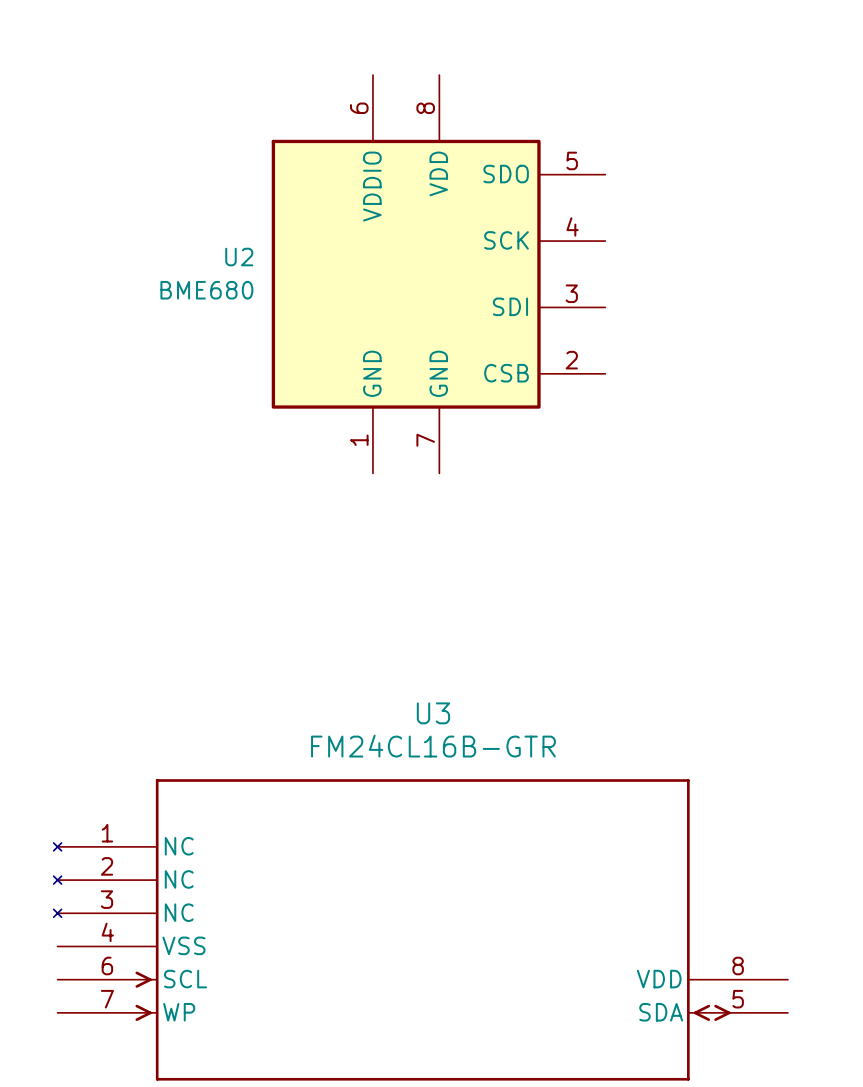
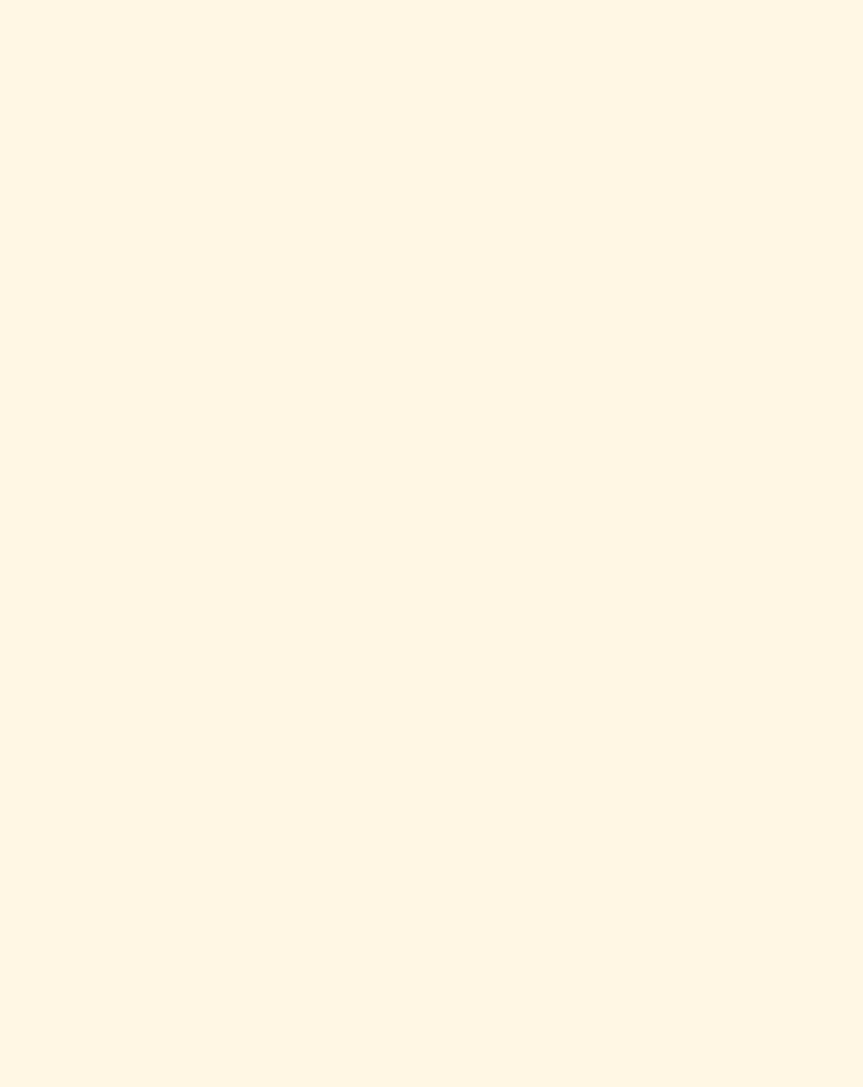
U2: BME680 (438, 274) -> none
U3: FM24CL16B-GTR (420, 929) -> none

